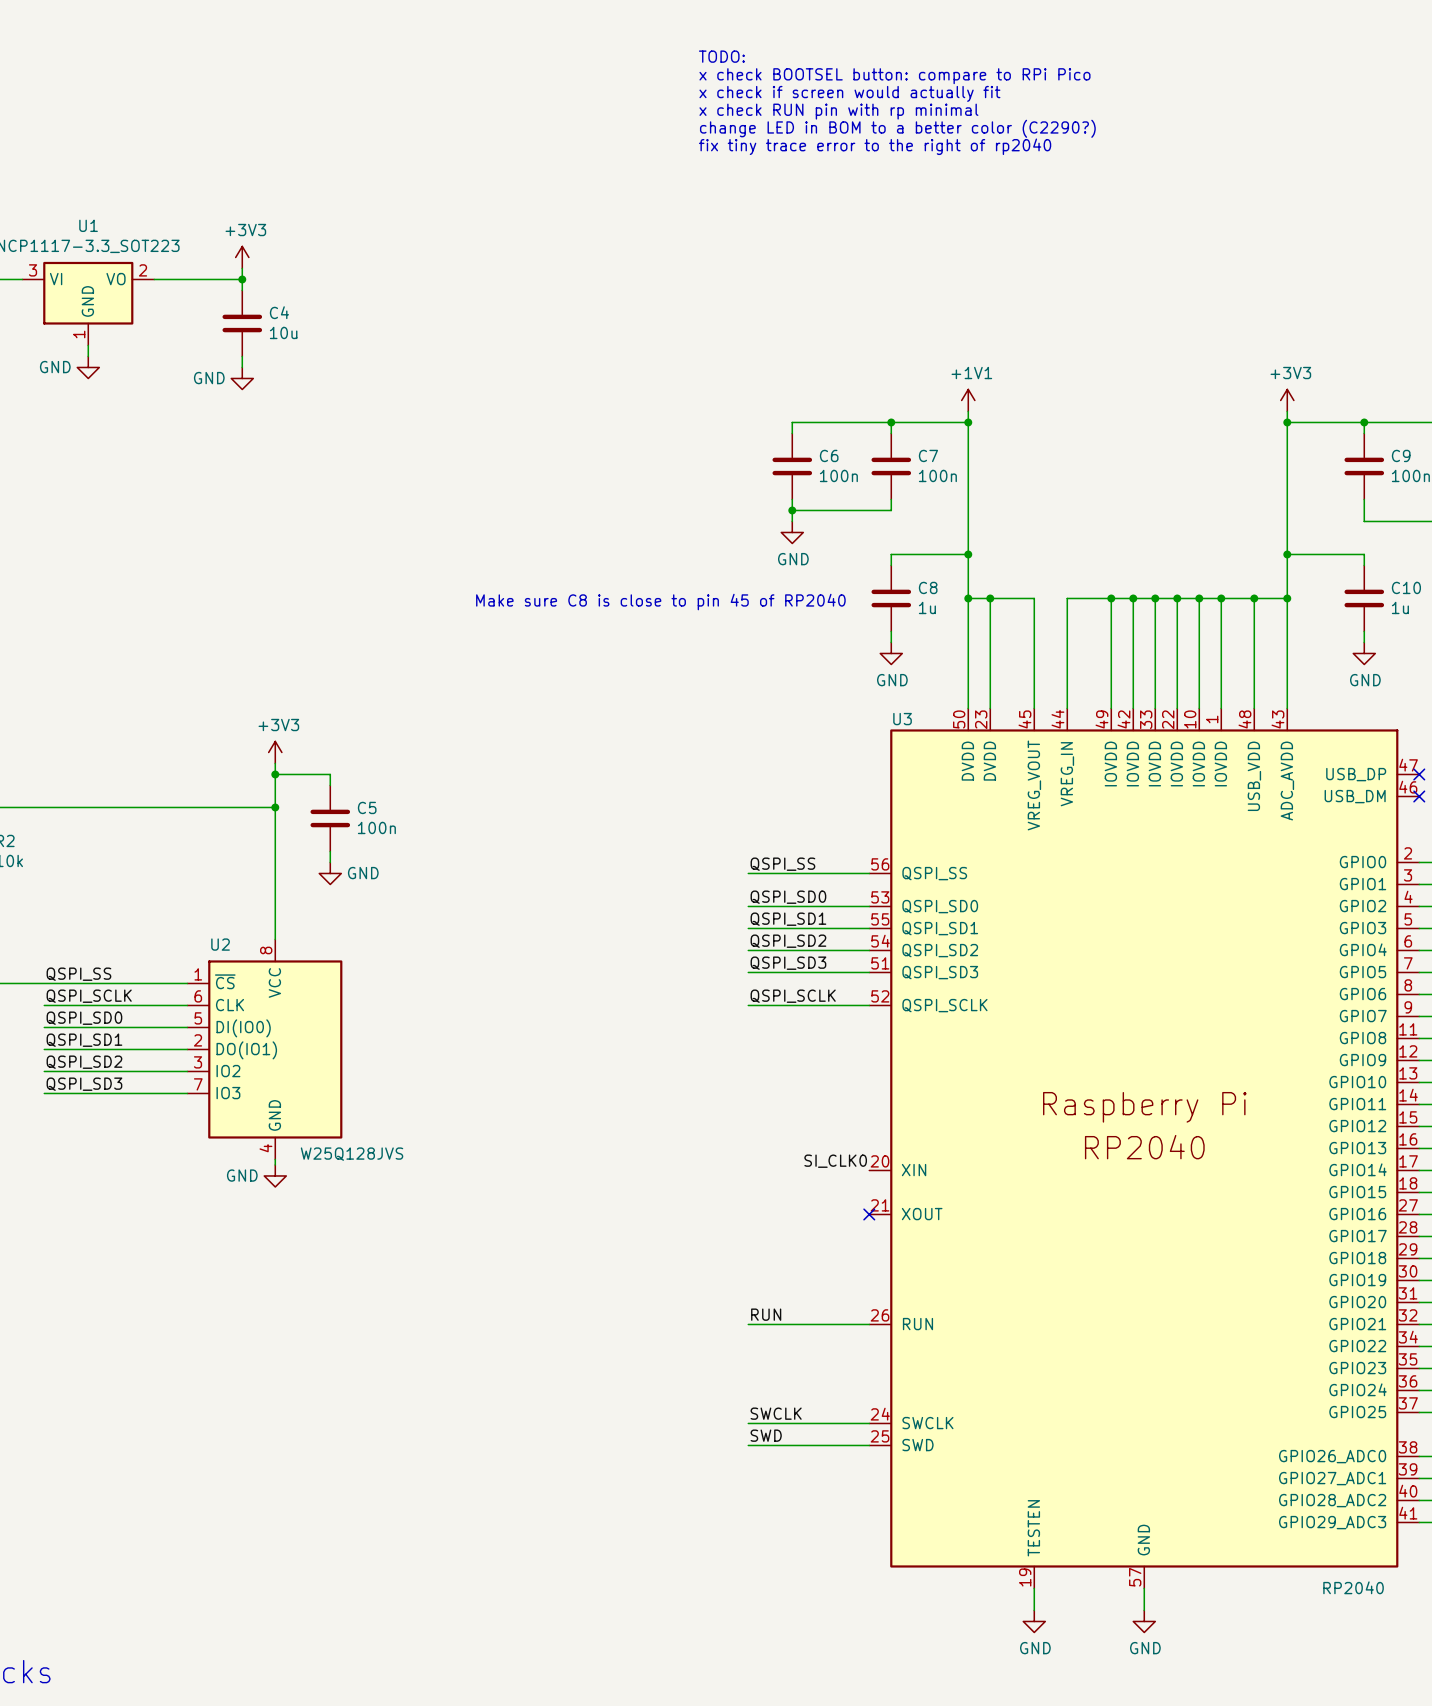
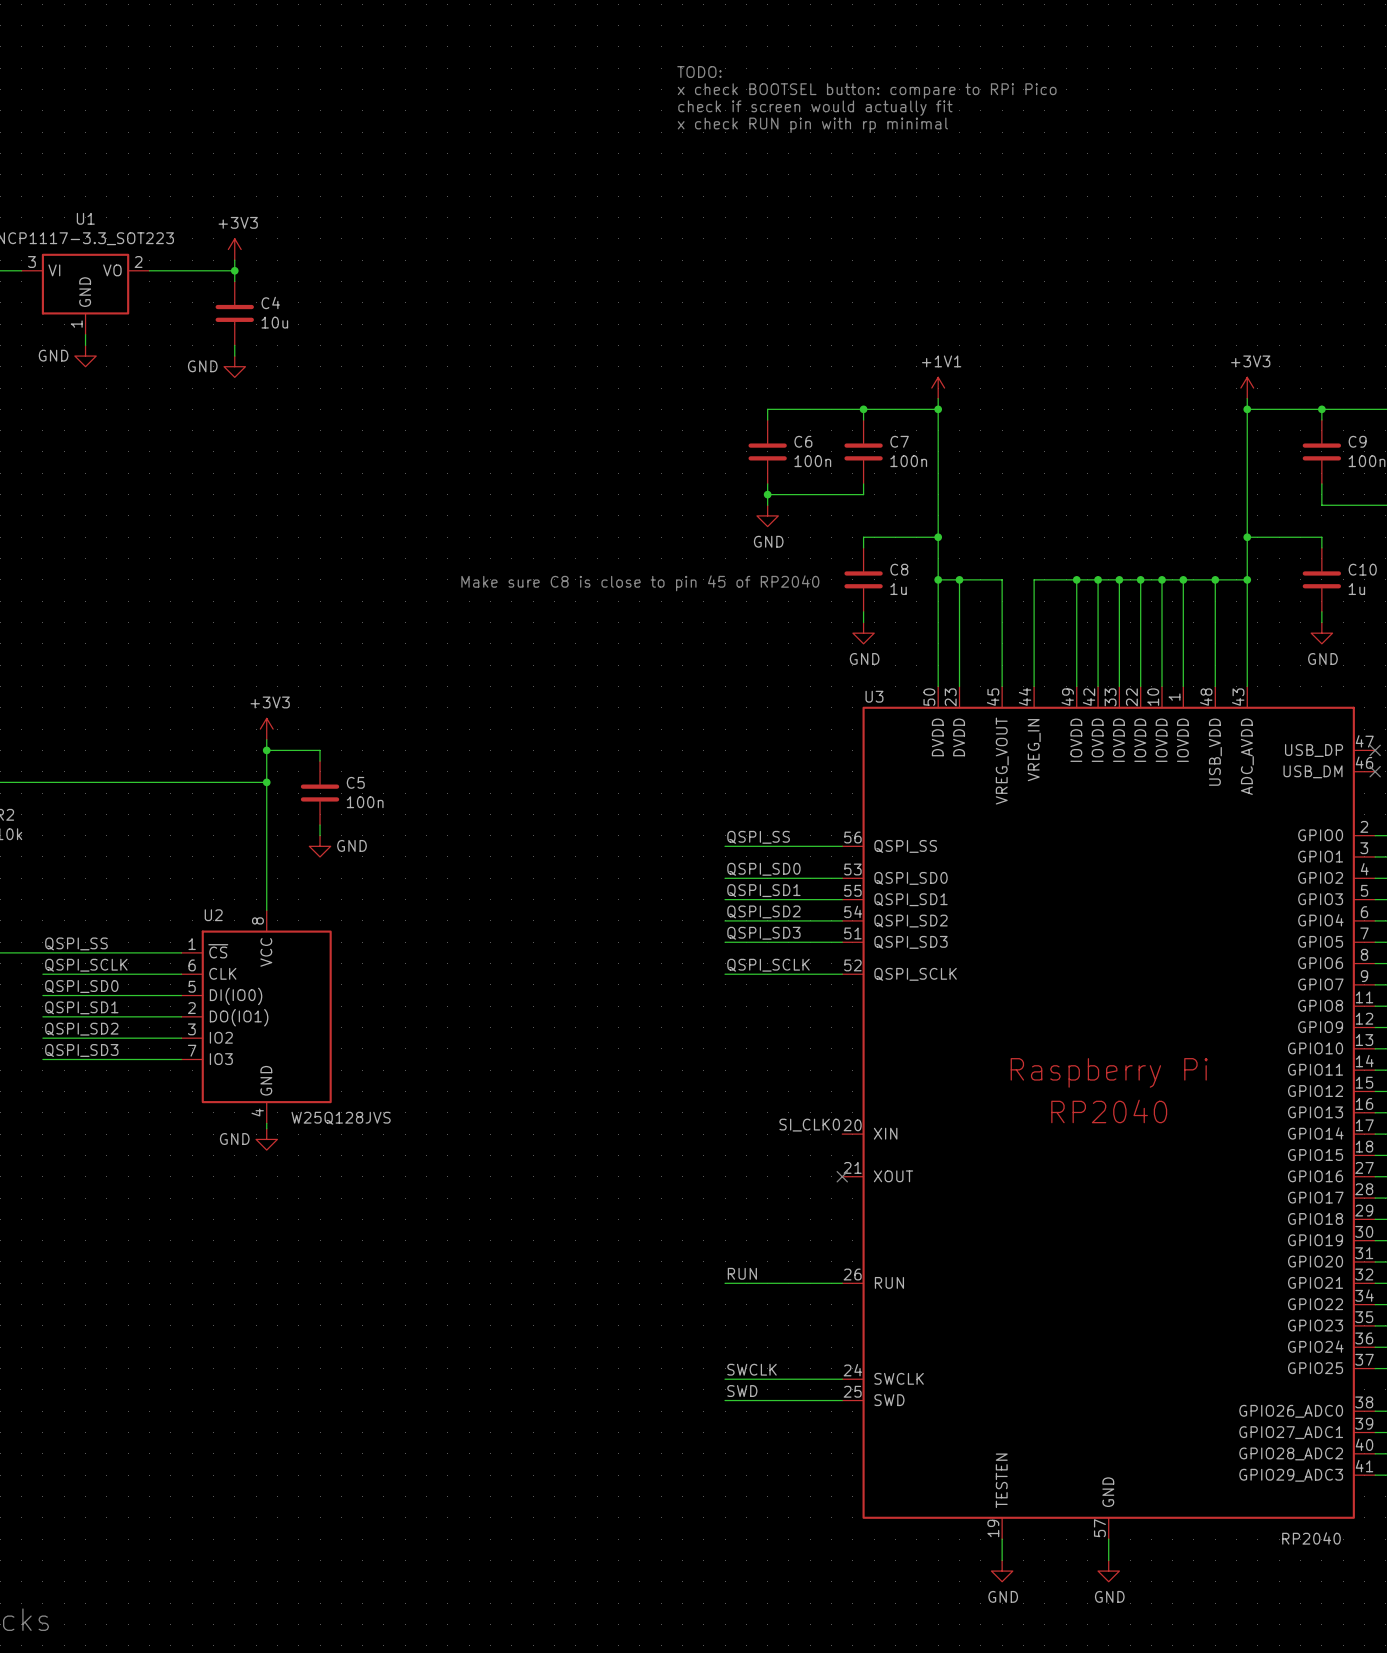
text: TODO: (721, 56) -> none
text: x check BOOTSEL button: compare to RPi Pico (894, 76) -> TODO: (699, 72)
text: x check if screen would actually fit (849, 93) -> x check BOOTSEL button: compare to RPi Pico (867, 90)
text: x check RUN pin with rp minimal (838, 111) -> check if screen would actually fit (815, 108)
text: change LED in BOM to a better color (C2290?) (897, 128) -> x check RUN pin with rp minimal (812, 125)
text: fix tiny trace error to the right of rp2040 (875, 146) -> none

